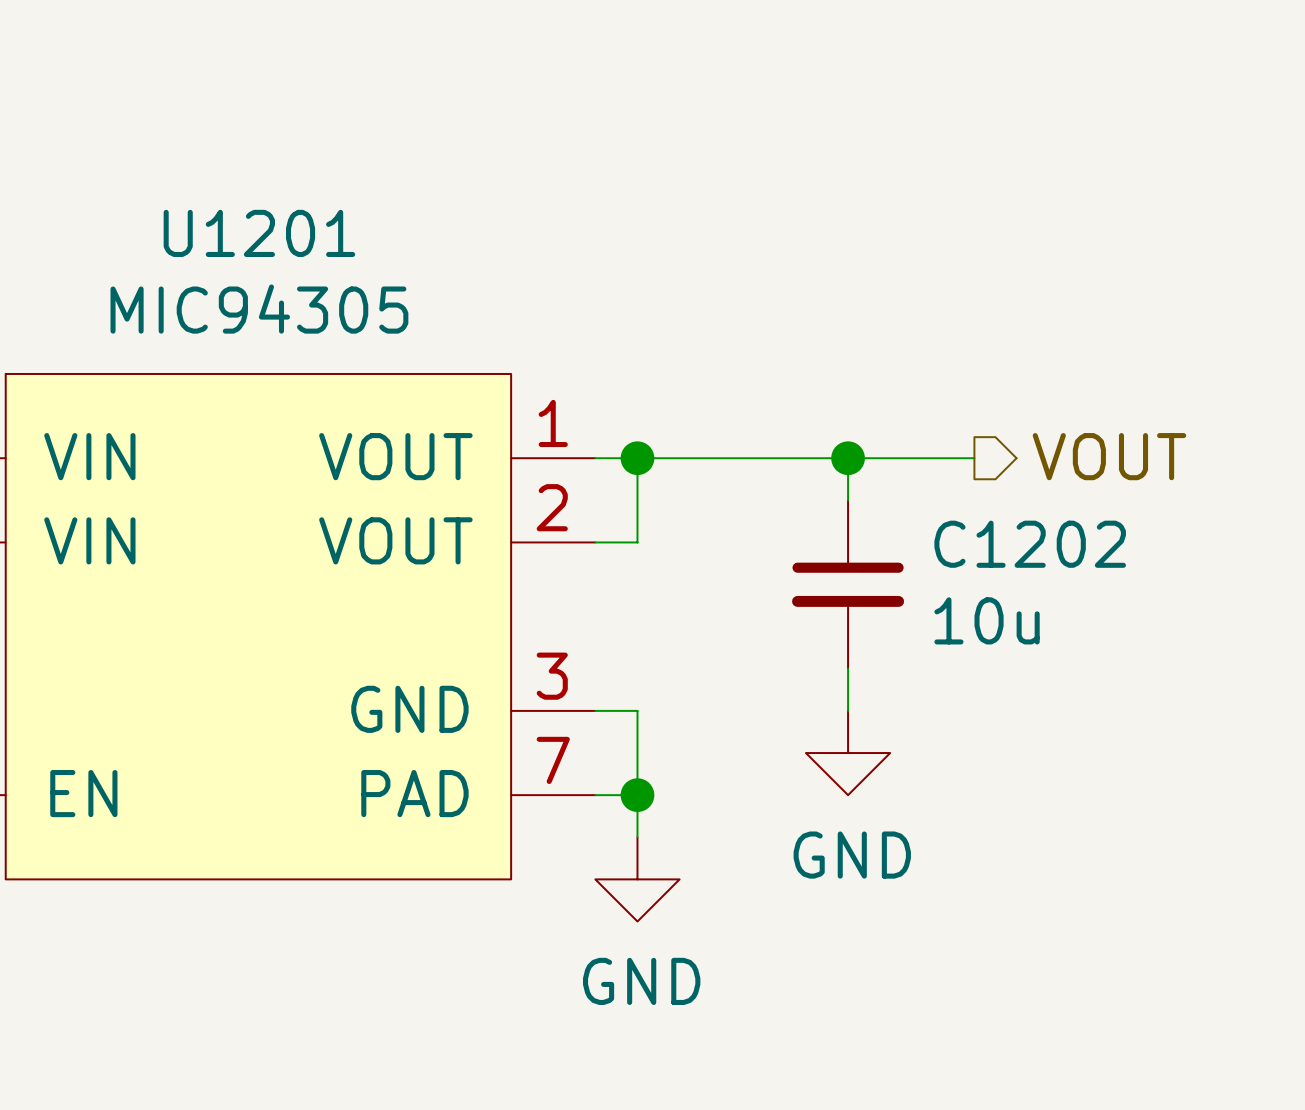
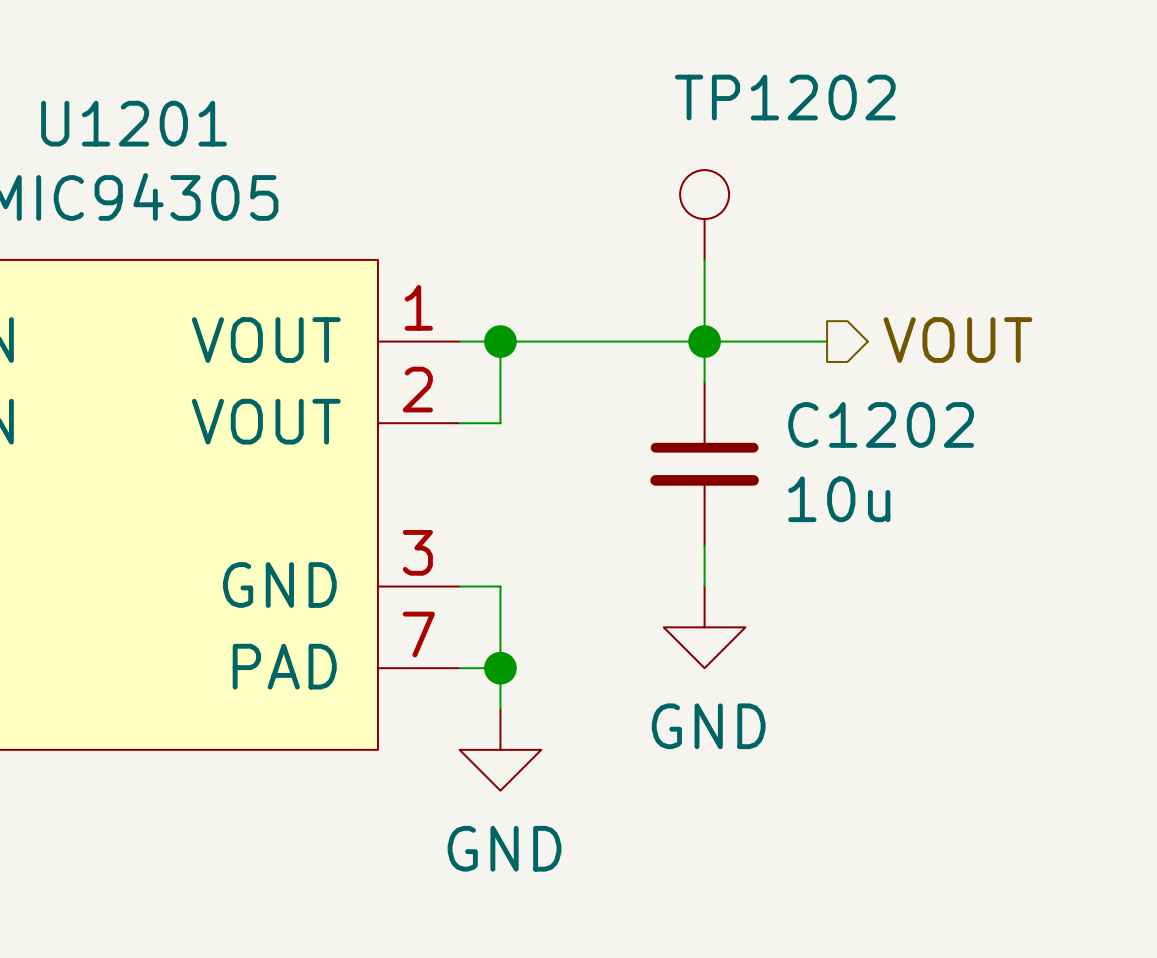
TP1202: none -> (704, 215)
wire: none -> (704, 259) (704, 341)

